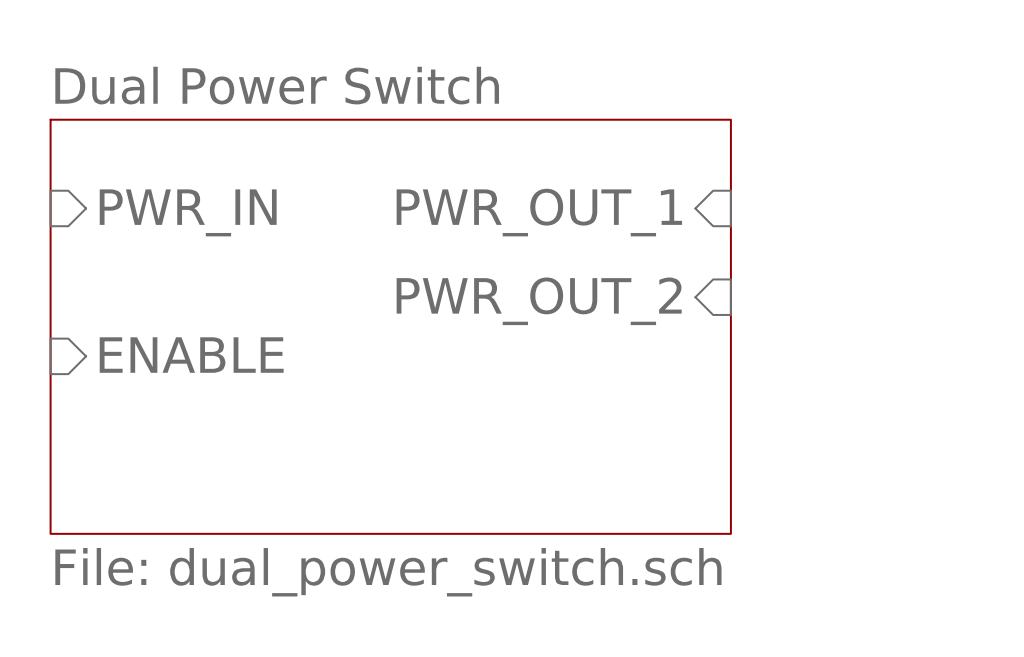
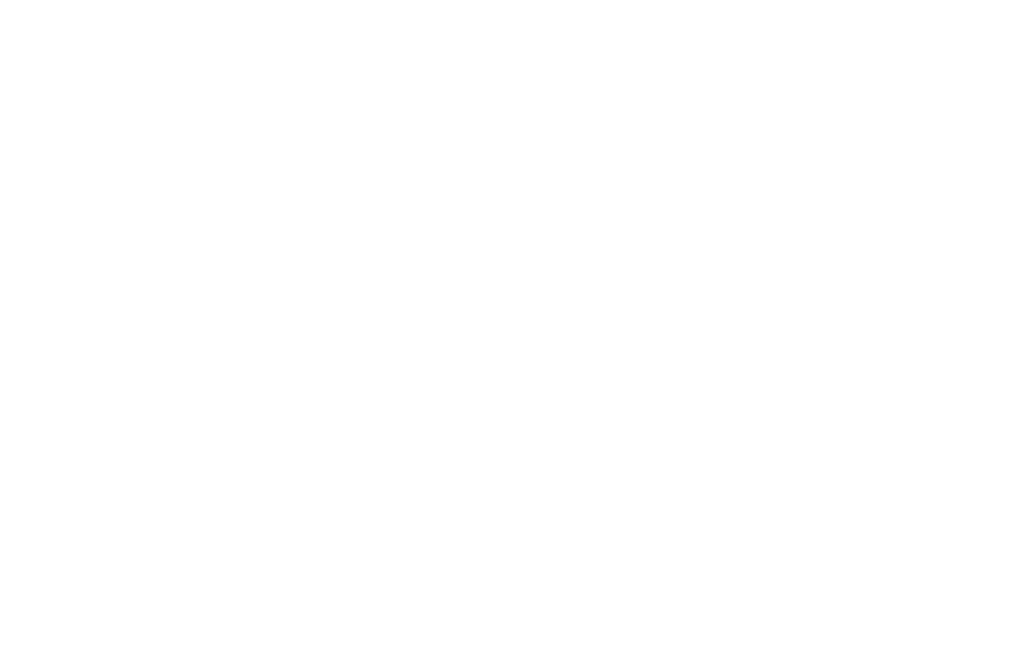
sheet pin: PWR_IN (188, 212) -> none
sheet pin: PWR_OUT_1 (539, 212) -> none
sheet pin: PWR_OUT_2 (539, 301) -> none
sheet Dual Power Switch: File: dual_power_switch.sch (390, 326) -> none
sheet pin: ENABLE (191, 355) -> none

